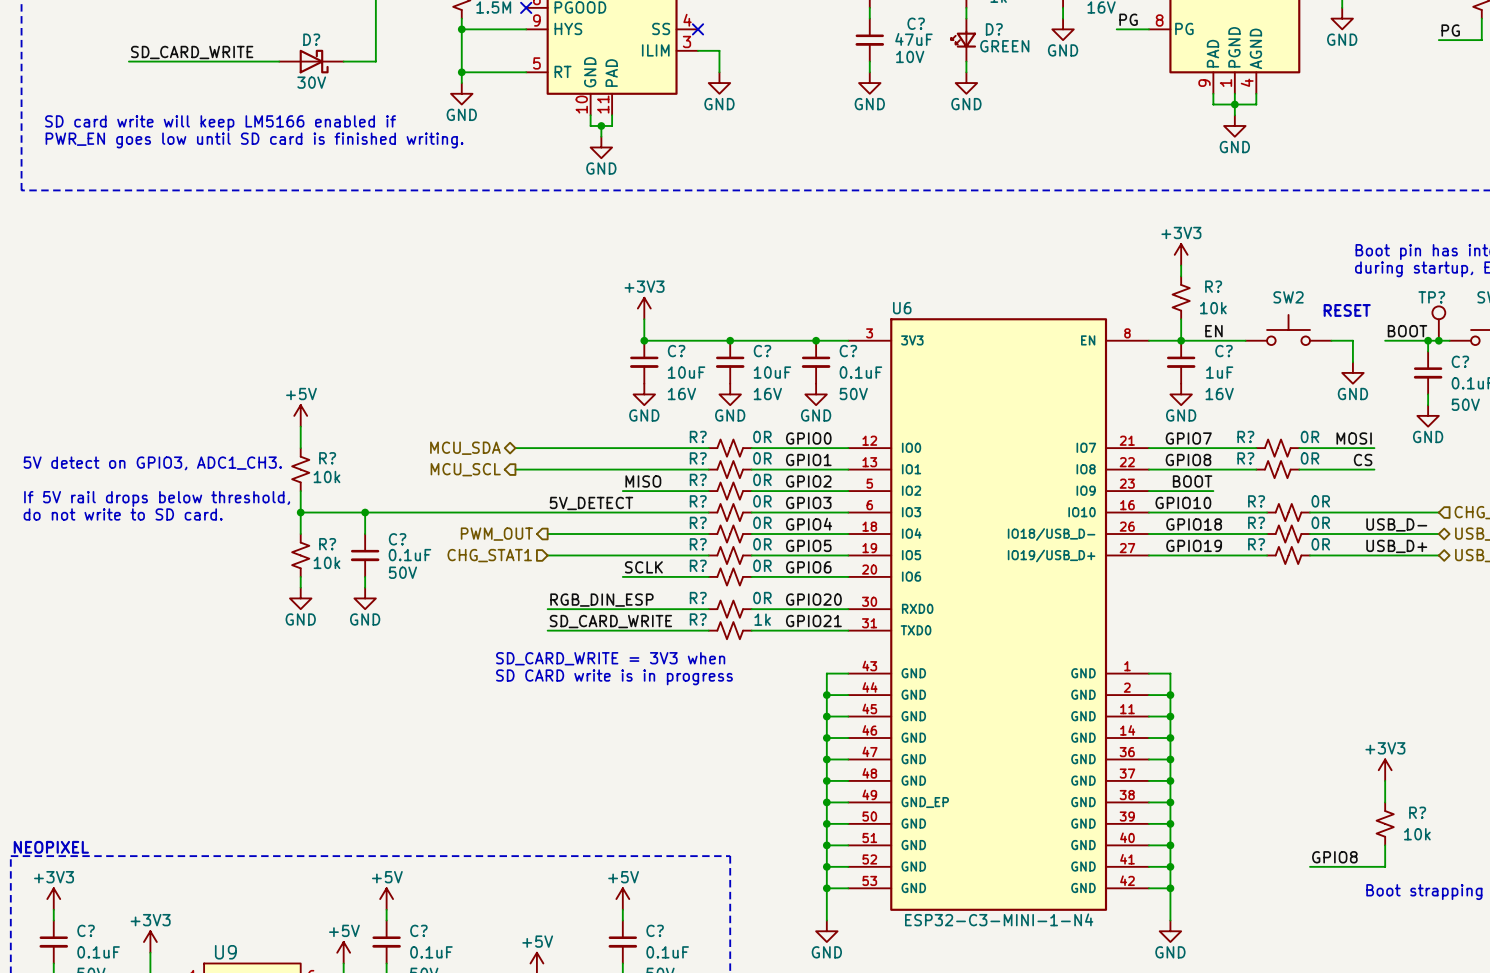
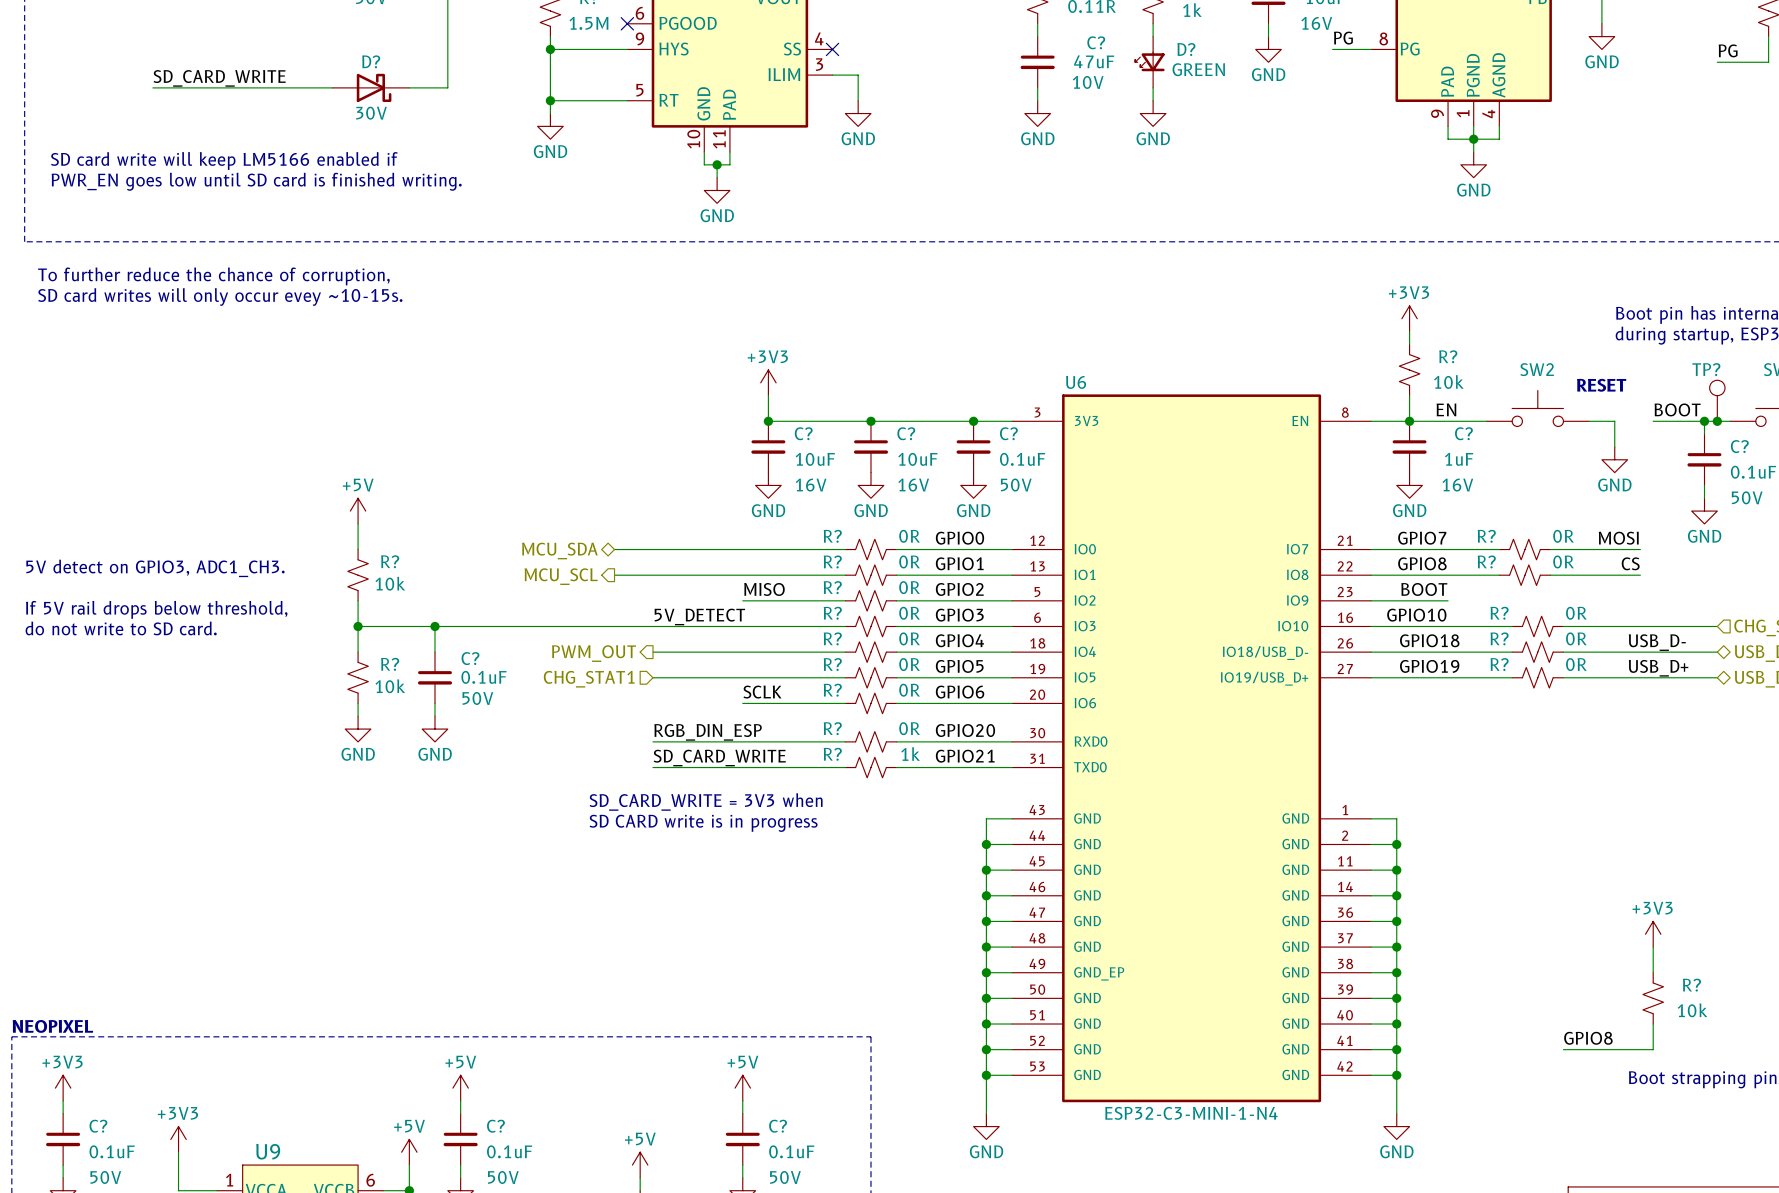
text: none -> To further reduce the chance of corruption, (213, 276)
text: none -> SD card writes will only occur evey ~10-15s. (220, 297)

